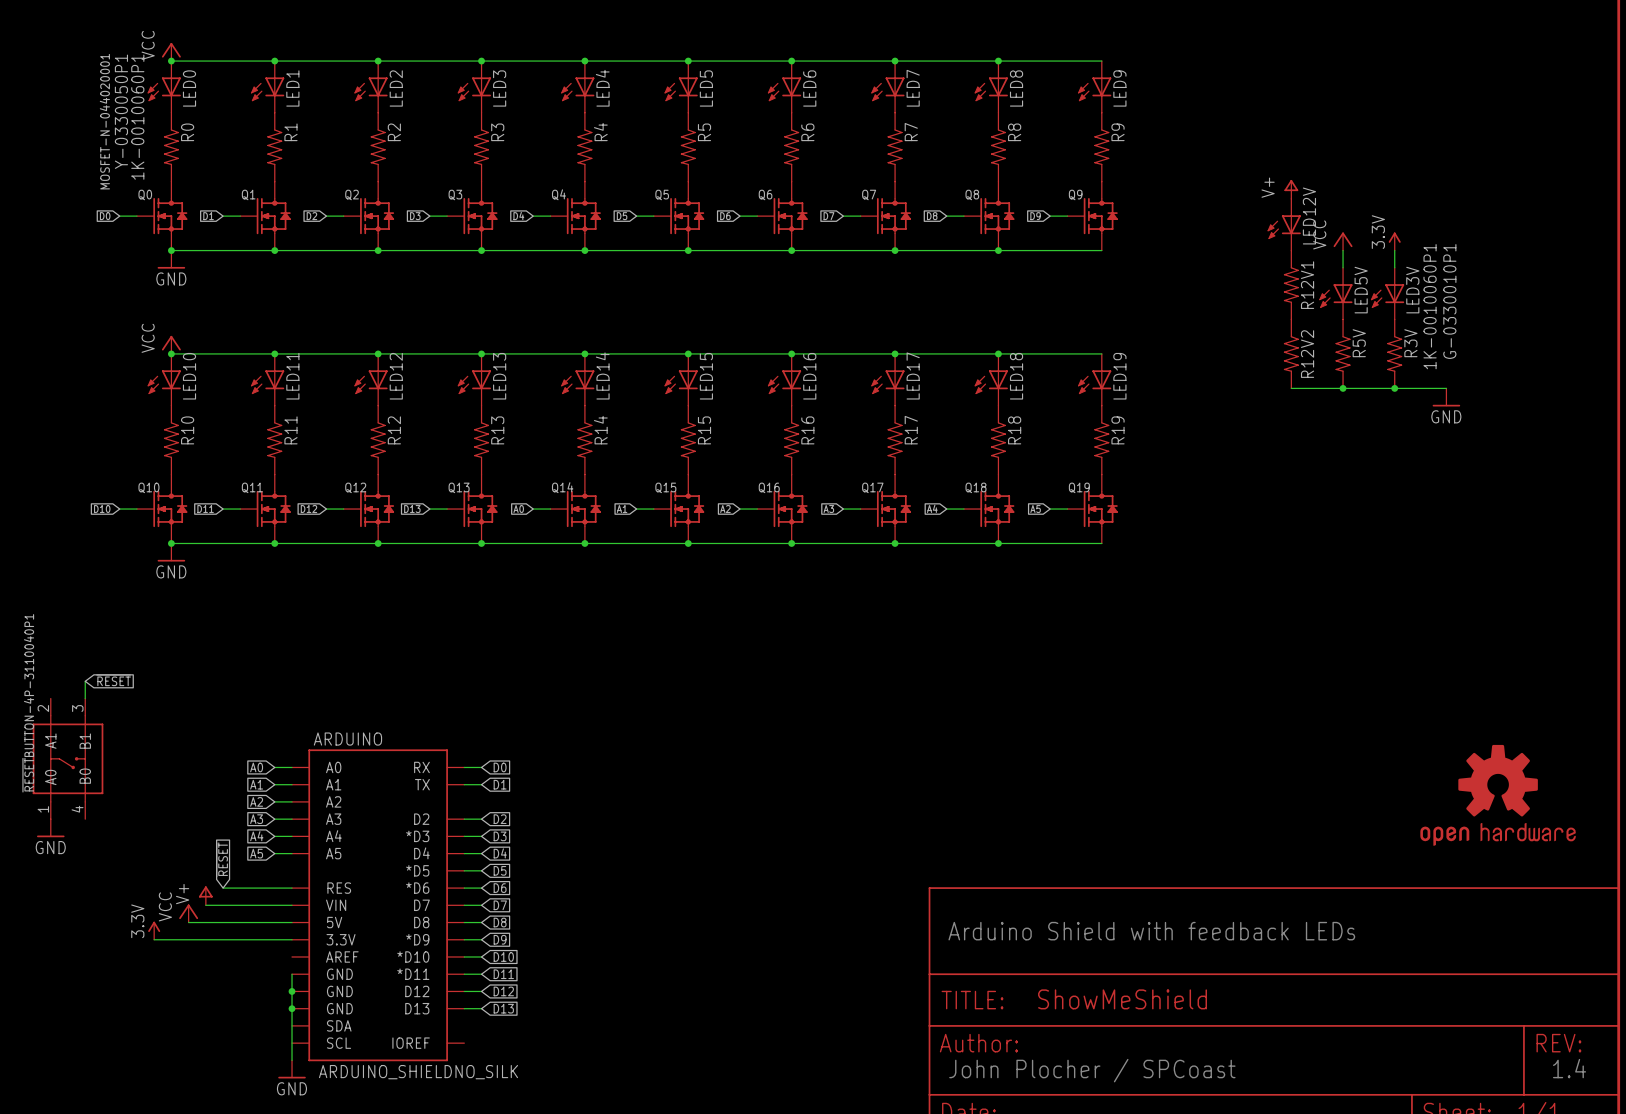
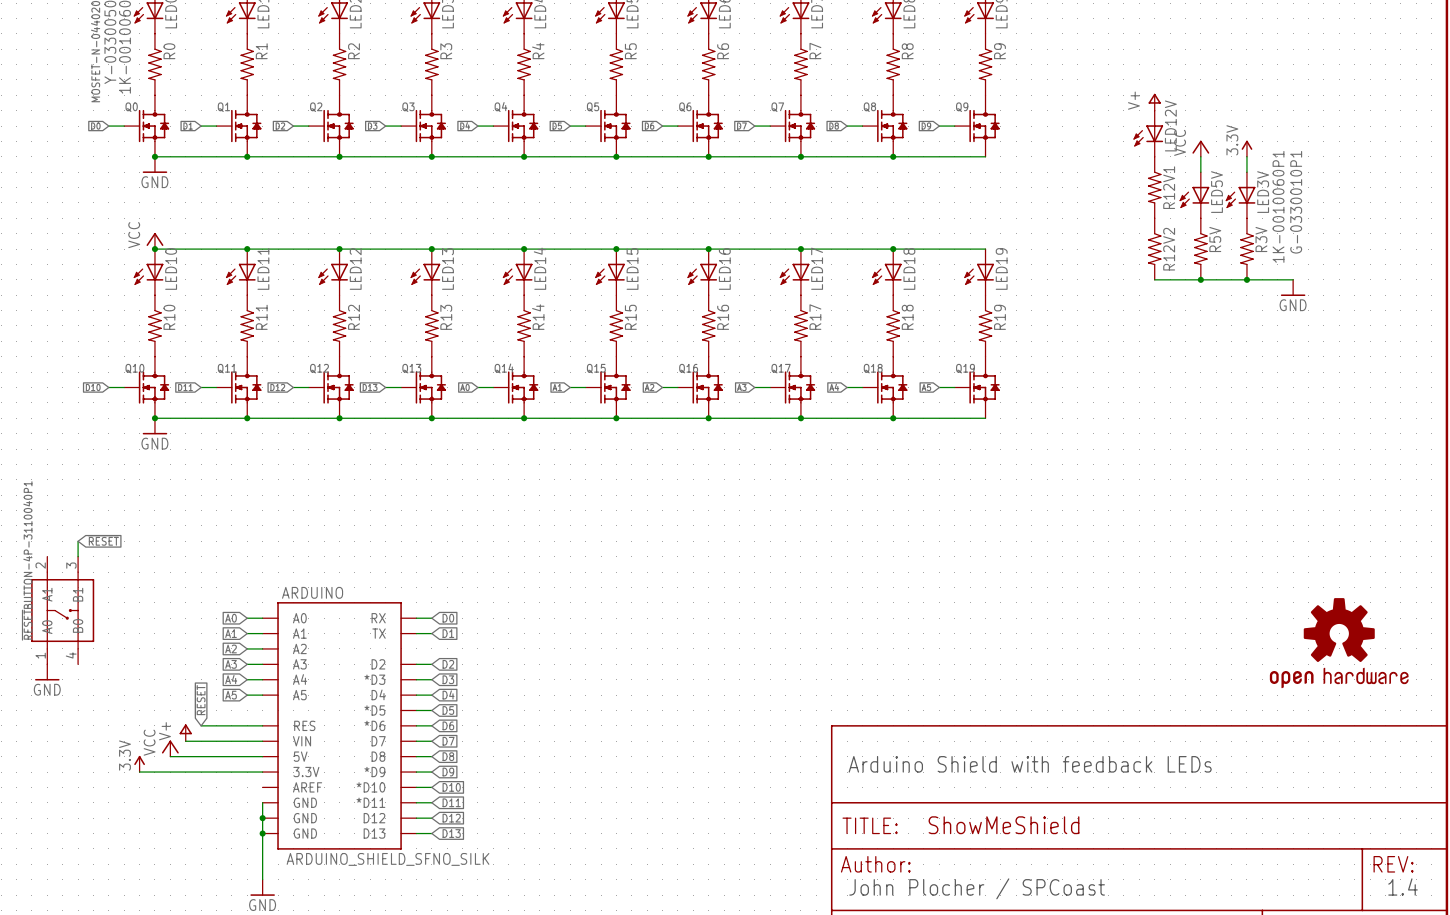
ARDUINO: none -> ARDUINO_SHIELD_SFNO_SILK (339, 725)
ARDUINO: ARDUINO_SHIELDNO_SILK (378, 905) -> none

